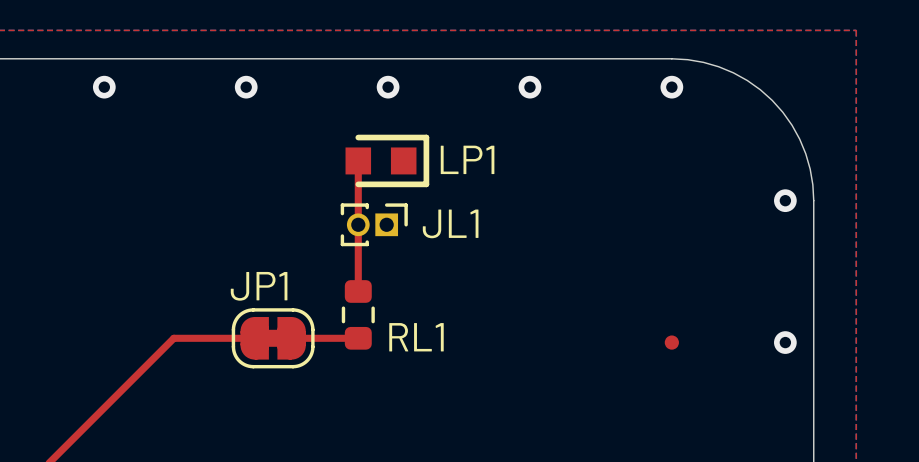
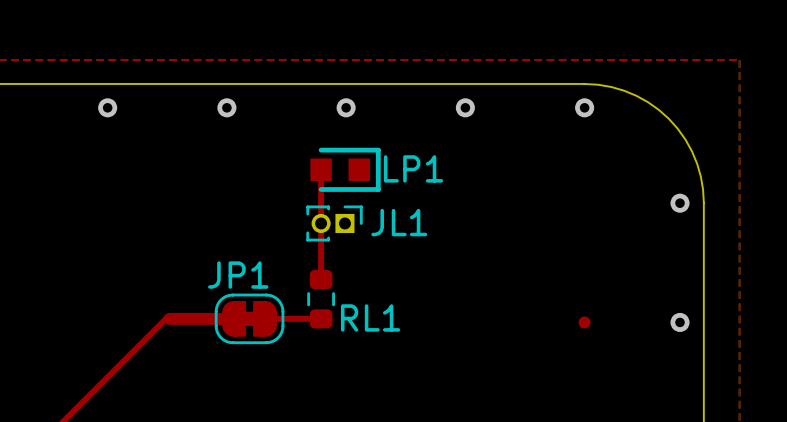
top track width: thin (178, 338) (254, 338) -> thick (169, 318) (234, 318)

